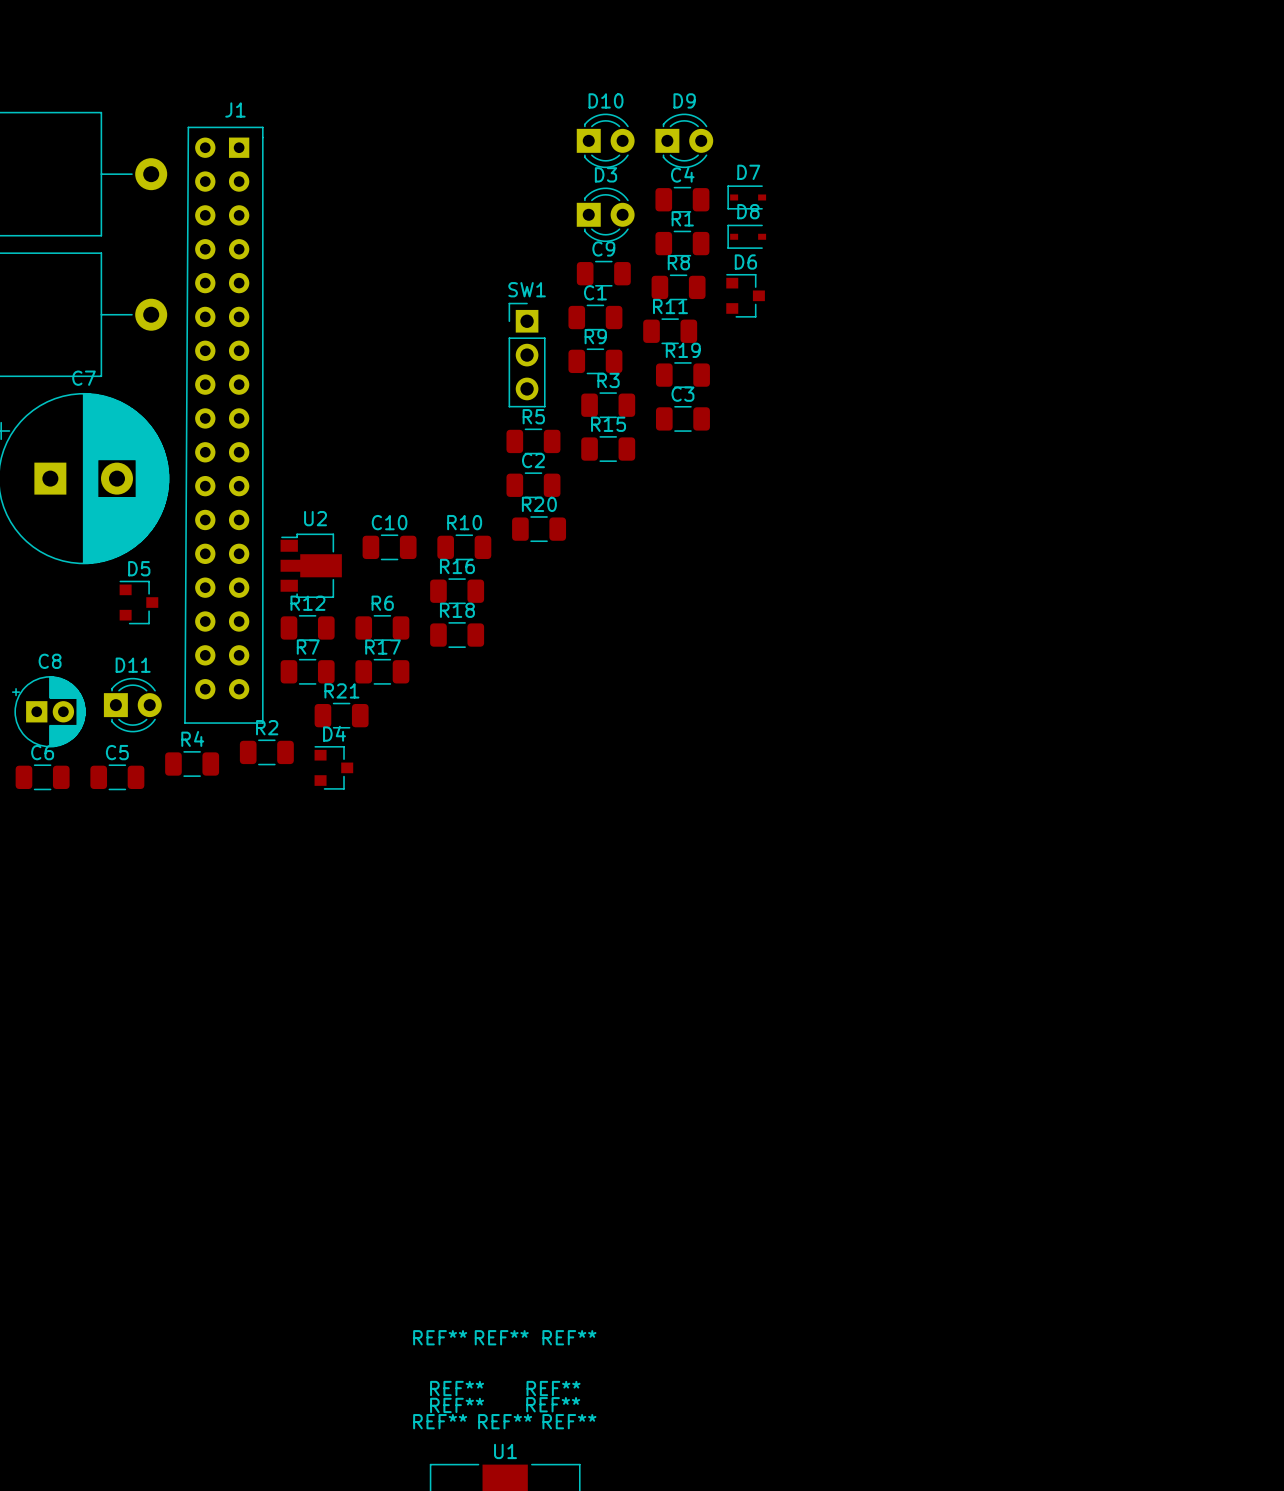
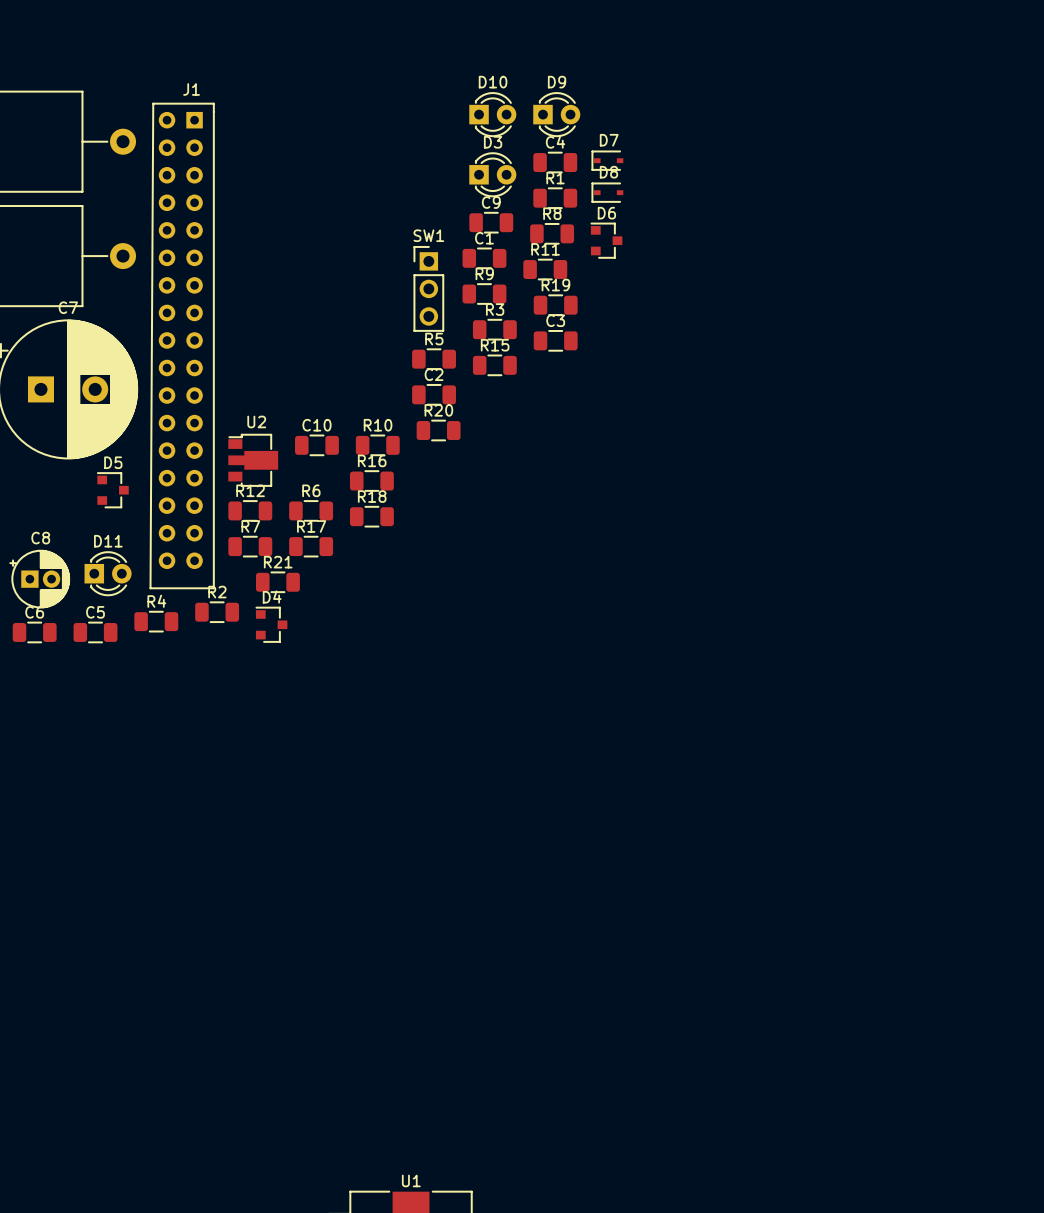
REF**: (440, 1337) -> none
REF**: (501, 1337) -> none
REF**: (569, 1337) -> none
REF**: (457, 1388) -> none
REF**: (553, 1388) -> none
REF**: (553, 1404) -> none
REF**: (457, 1405) -> none
REF**: (440, 1421) -> none
REF**: (505, 1421) -> none
REF**: (569, 1421) -> none

